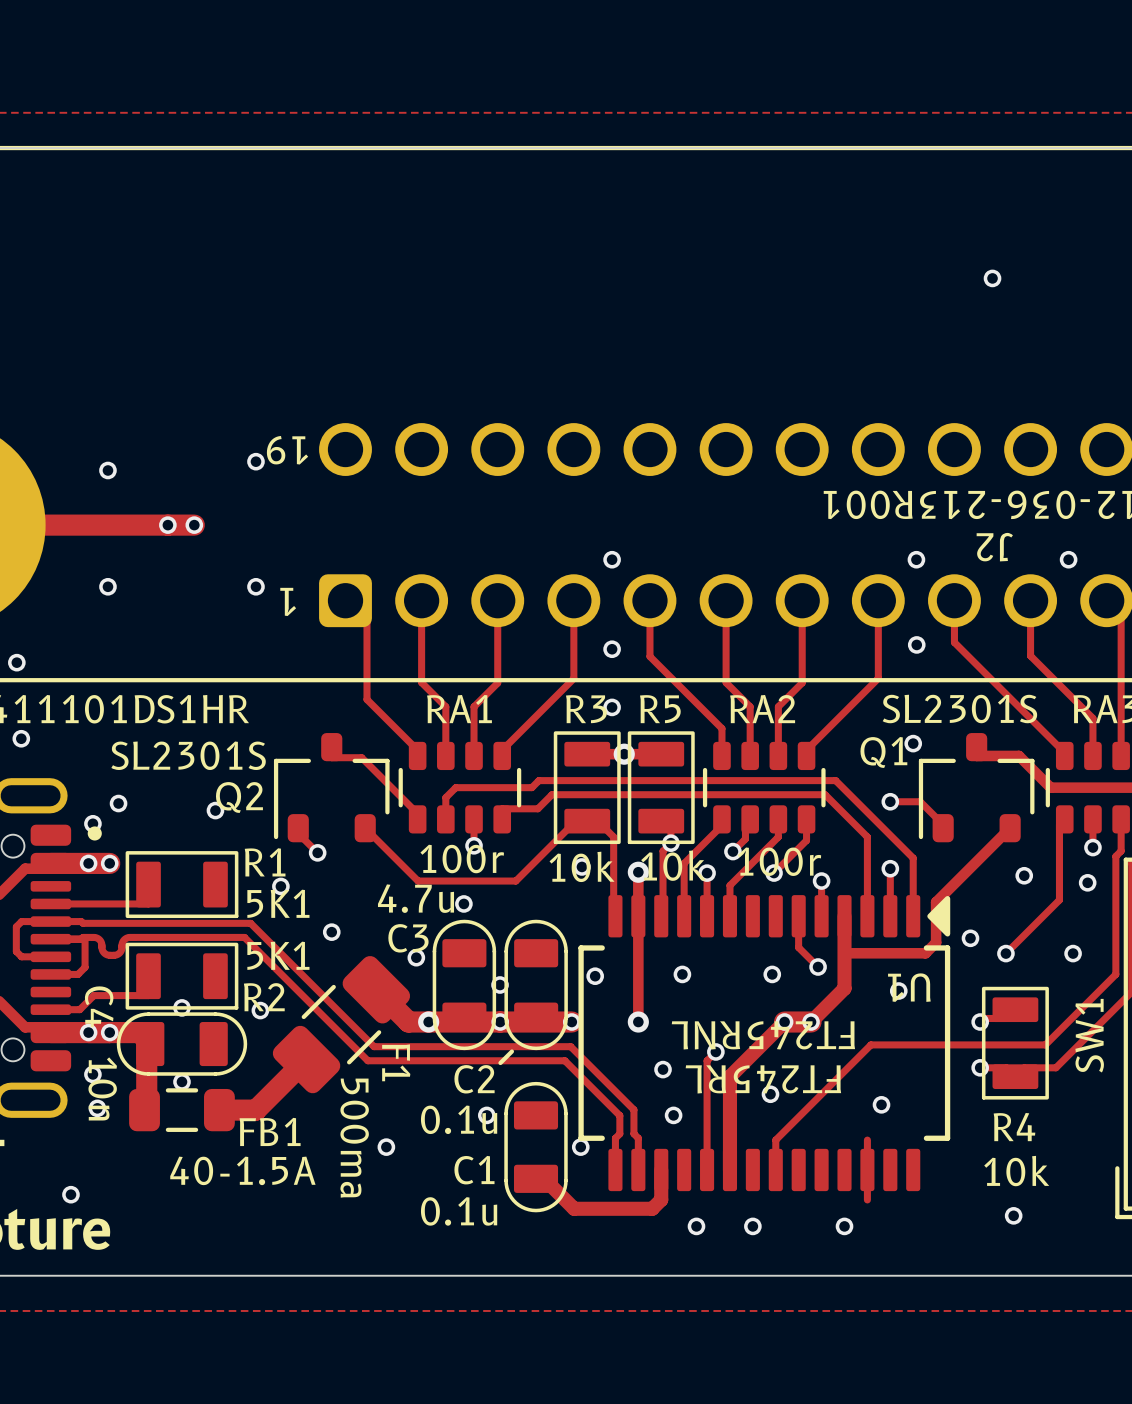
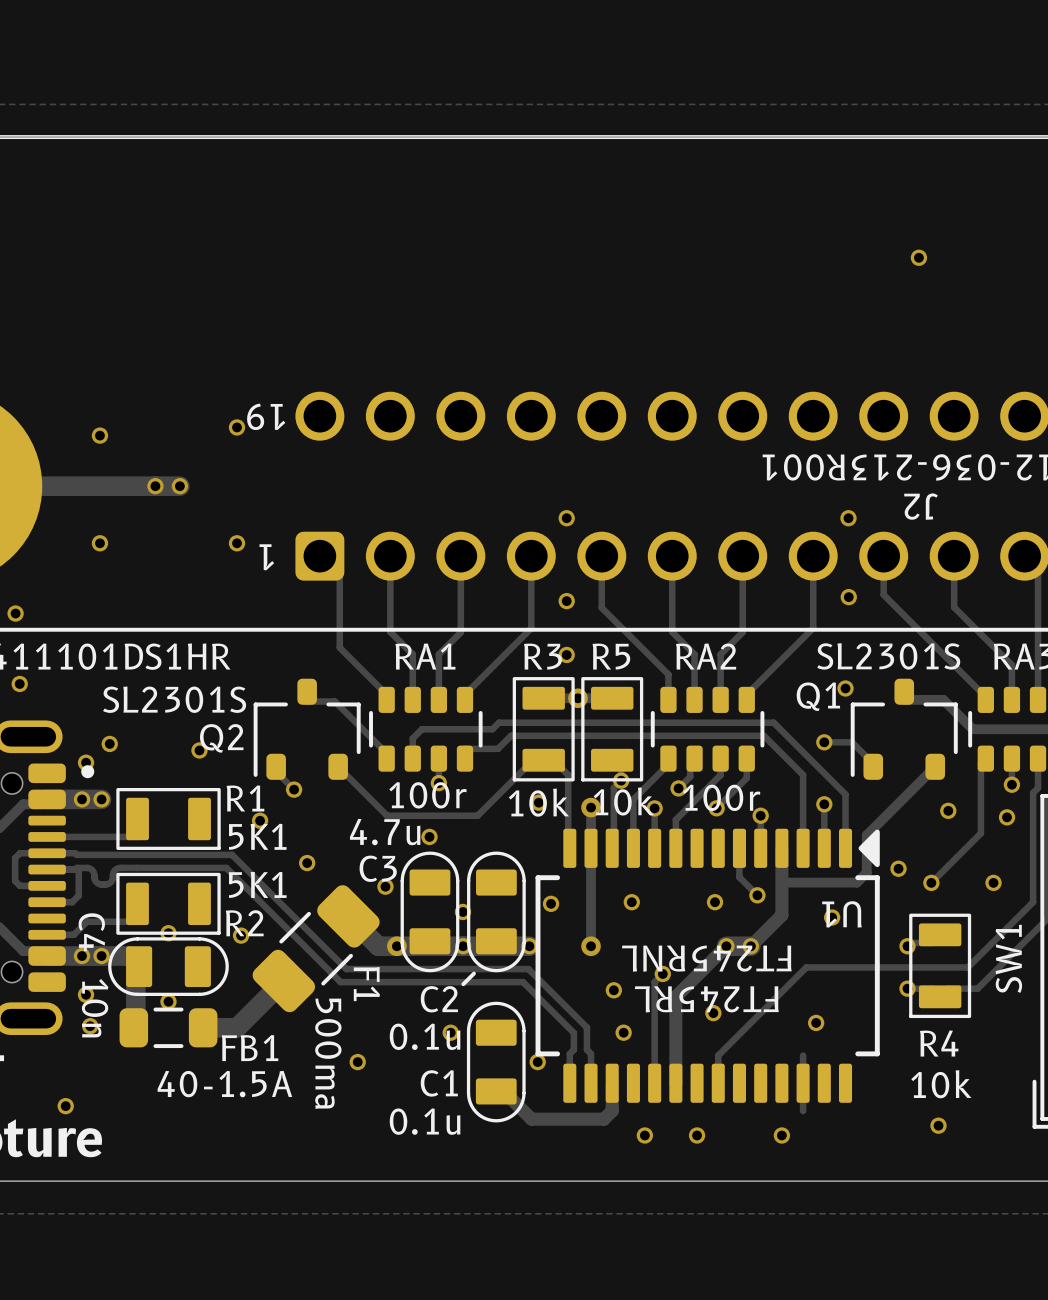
via: (1068, 559) -> none

